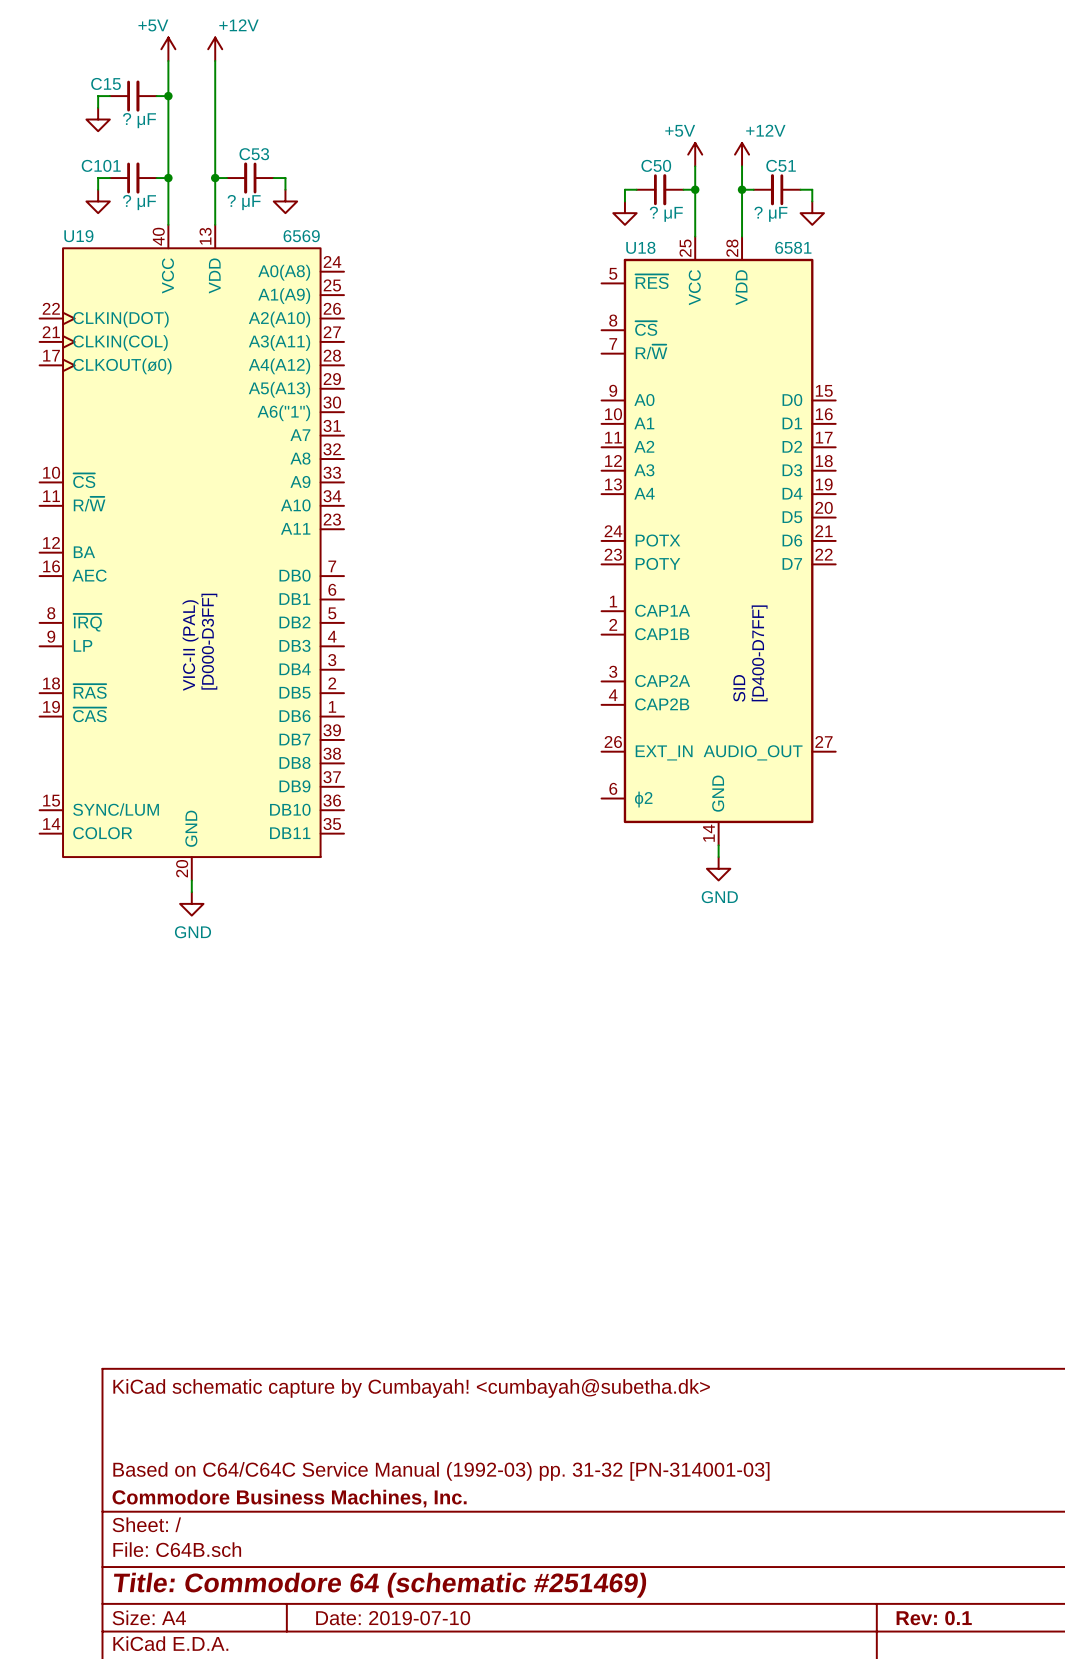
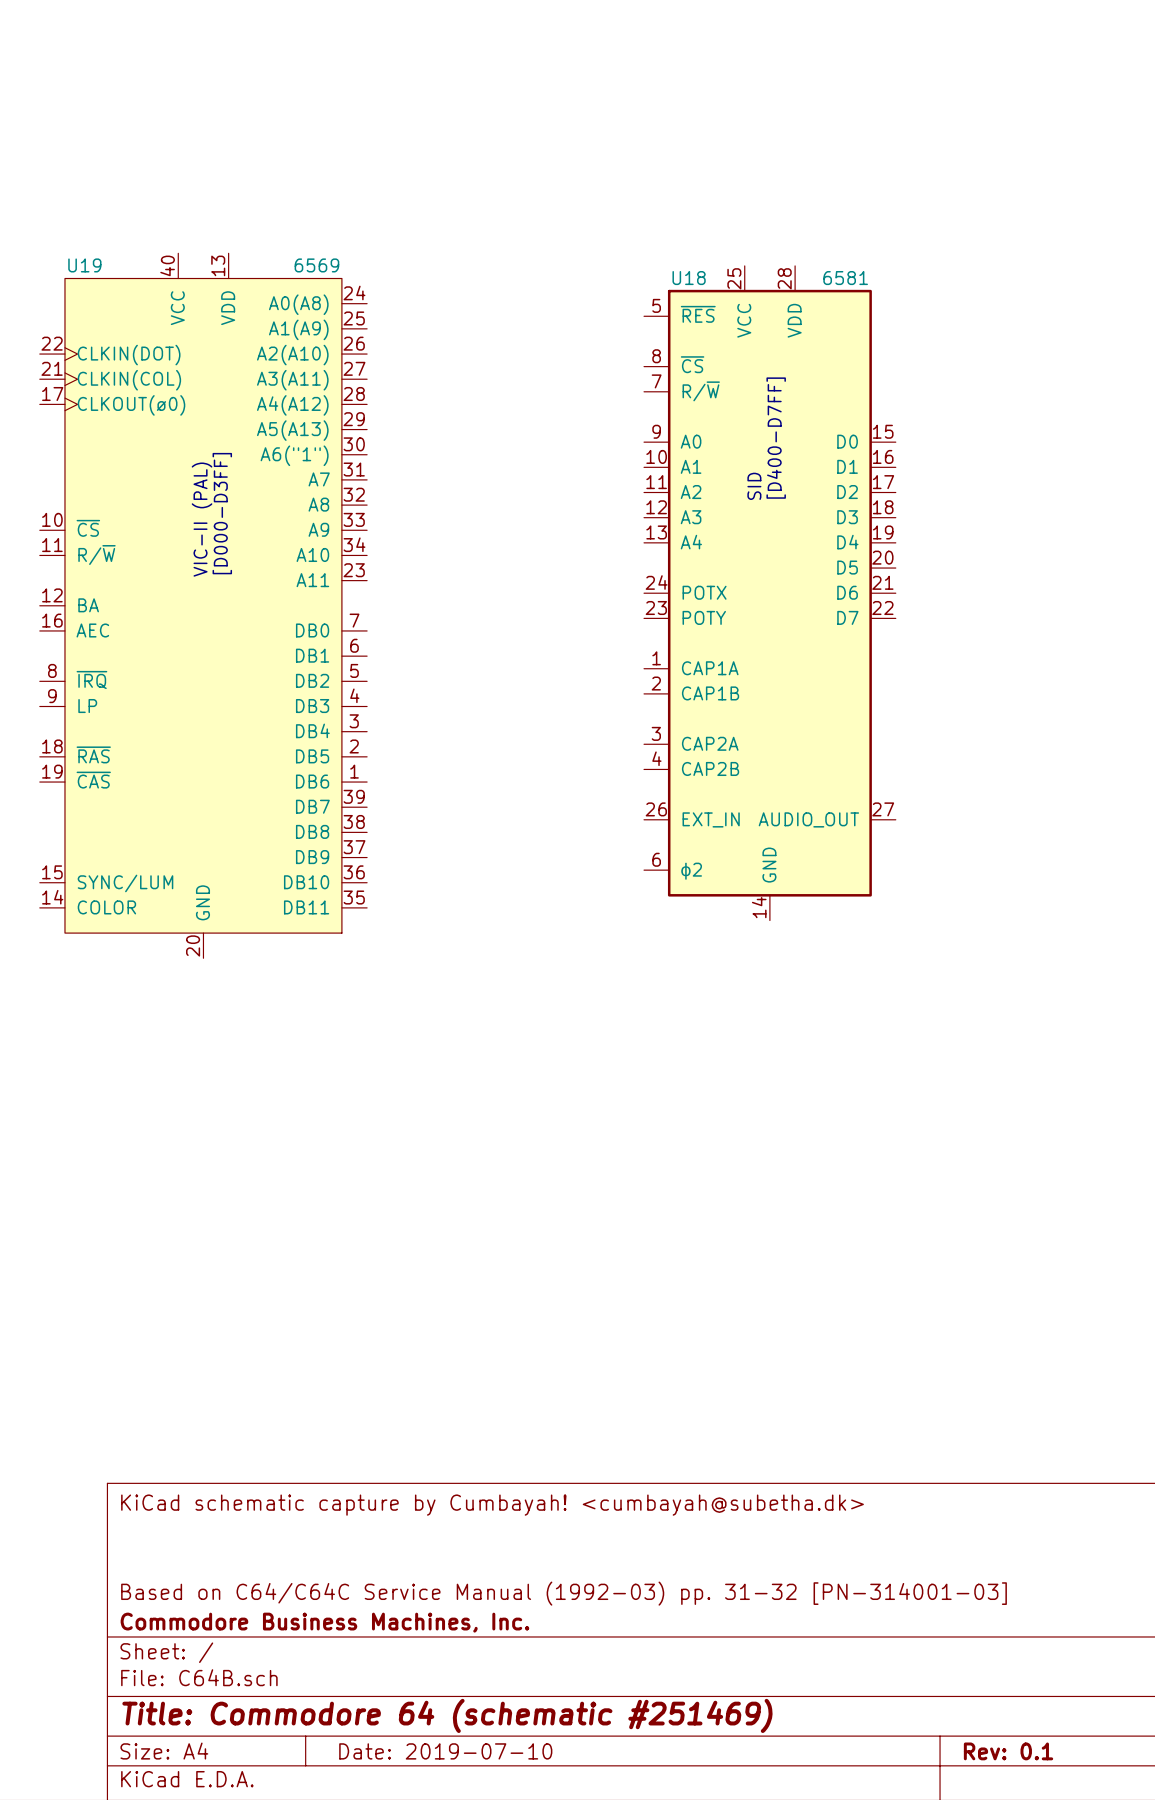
power symbol: +5V (168, 49) -> none
power symbol: +12V (215, 49) -> none
wire: (168, 60) (168, 224) -> none
wire: (215, 60) (215, 224) -> none
wire: (109, 96) (98, 96) (98, 107) -> none
C15: ? μF (133, 96) -> none
wire: (156, 96) (168, 96) -> none
junction: (168, 96) -> none
power symbol: (98, 119) -> none
power symbol: +5V (695, 154) -> none
power symbol: +12V (742, 154) -> none
wire: (695, 166) (695, 236) -> none
wire: (742, 166) (742, 236) -> none
wire: (109, 178) (98, 178) (98, 189) -> none
C101: ? μF (133, 178) -> none
wire: (156, 178) (168, 178) -> none
junction: (168, 178) -> none
wire: (215, 178) (226, 178) -> none
junction: (215, 178) -> none
C53: ? μF (250, 178) -> none
wire: (273, 178) (285, 178) (285, 189) -> none
wire: (636, 189) (624, 189) (624, 201) -> none
C50: ? μF (660, 189) -> none
wire: (683, 189) (695, 189) -> none
junction: (695, 189) -> none
wire: (742, 189) (753, 189) -> none
junction: (742, 189) -> none
C51: ? μF (777, 189) -> none
wire: (800, 189) (812, 189) (812, 201) -> none
power symbol: (98, 201) -> none
power symbol: (285, 201) -> none
power symbol: (624, 213) -> none
power symbol: (812, 213) -> none
text: none -> [D400-D7FF] (776, 438)
text: none -> SID (754, 486)
text position: [D000-D3FF] (209, 641) -> [D000-D3FF] (222, 513)
text position: VIC-II (PAL) (190, 645) -> VIC-II (PAL) (202, 519)
text: [D400-D7FF] (759, 653) -> none
text: SID (739, 688) -> none
wire: (718, 845) (718, 857) -> none
power symbol: GND (718, 868) -> none
wire: (191, 880) (191, 892) -> none
power symbol: GND (191, 903) -> none

